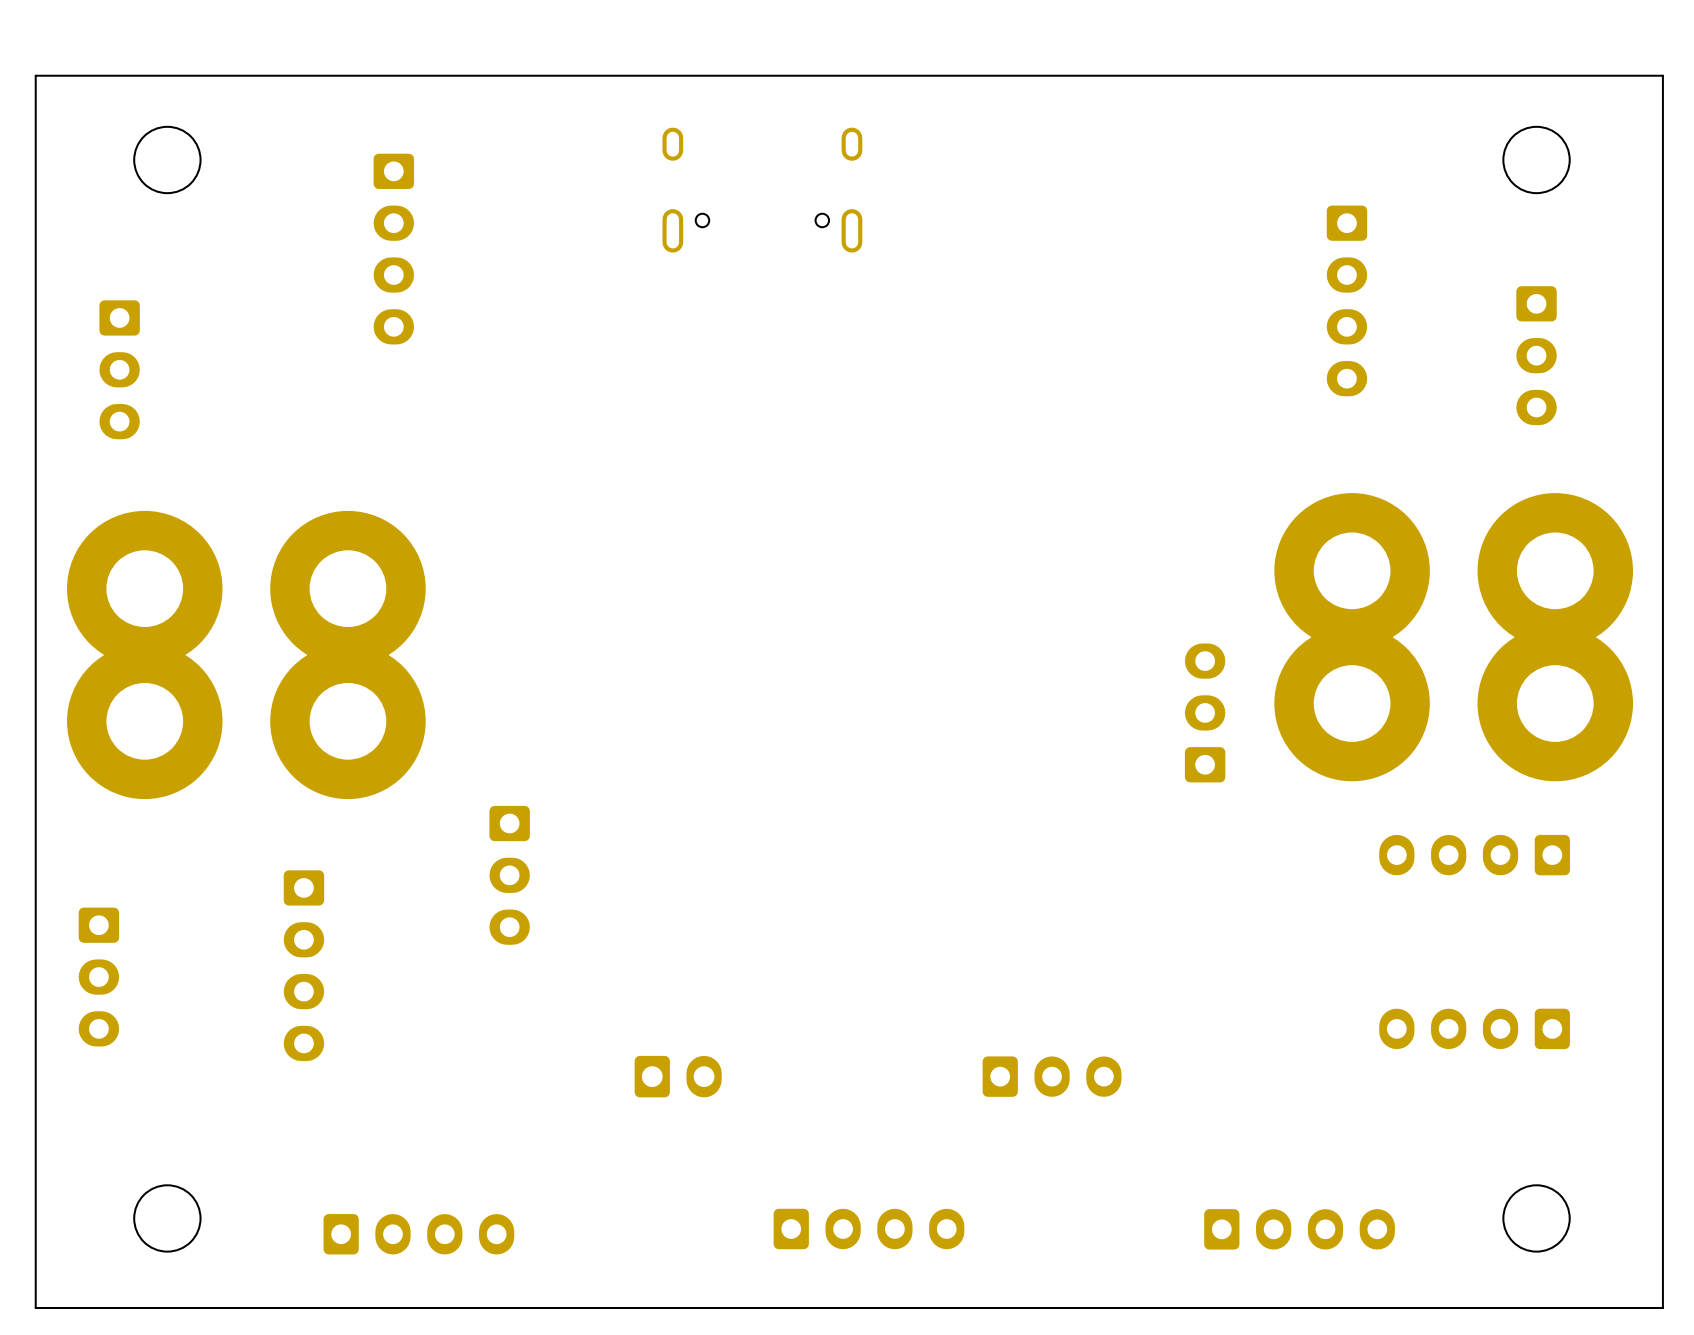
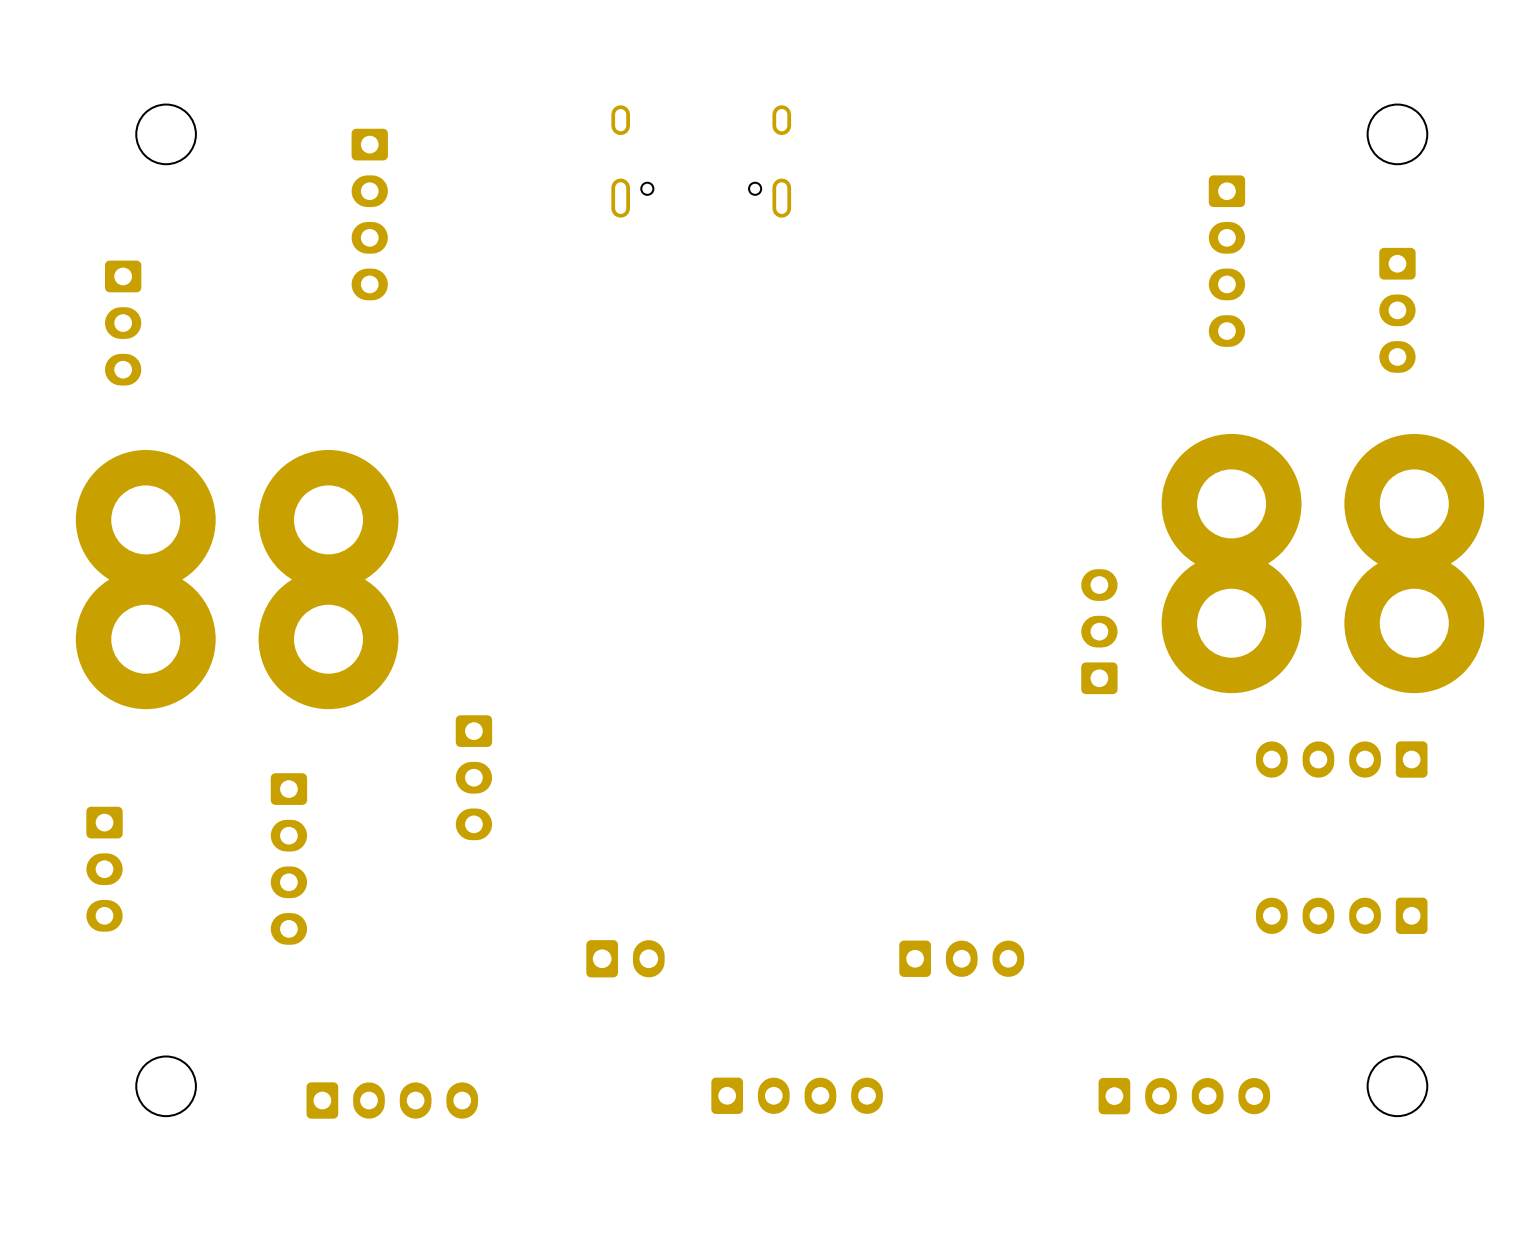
board edge: (1662, 75) (35, 75) (35, 1307) (1662, 1307) (1662, 75) -> none

